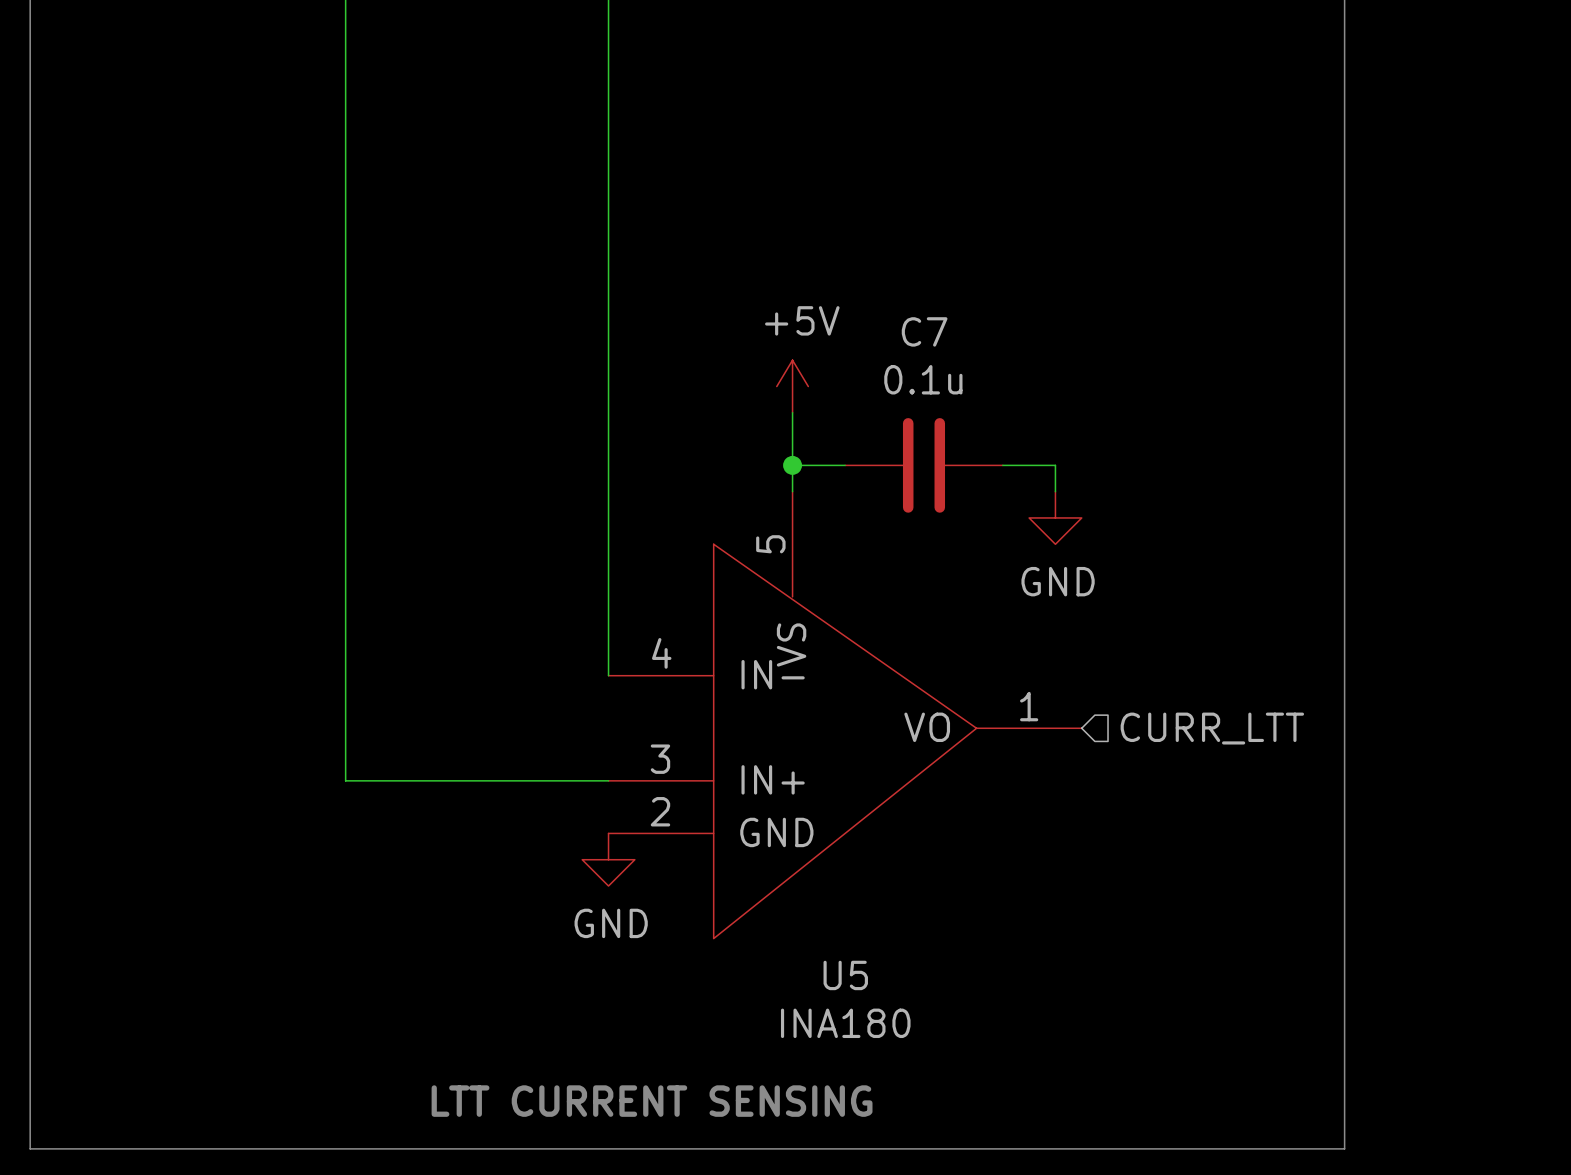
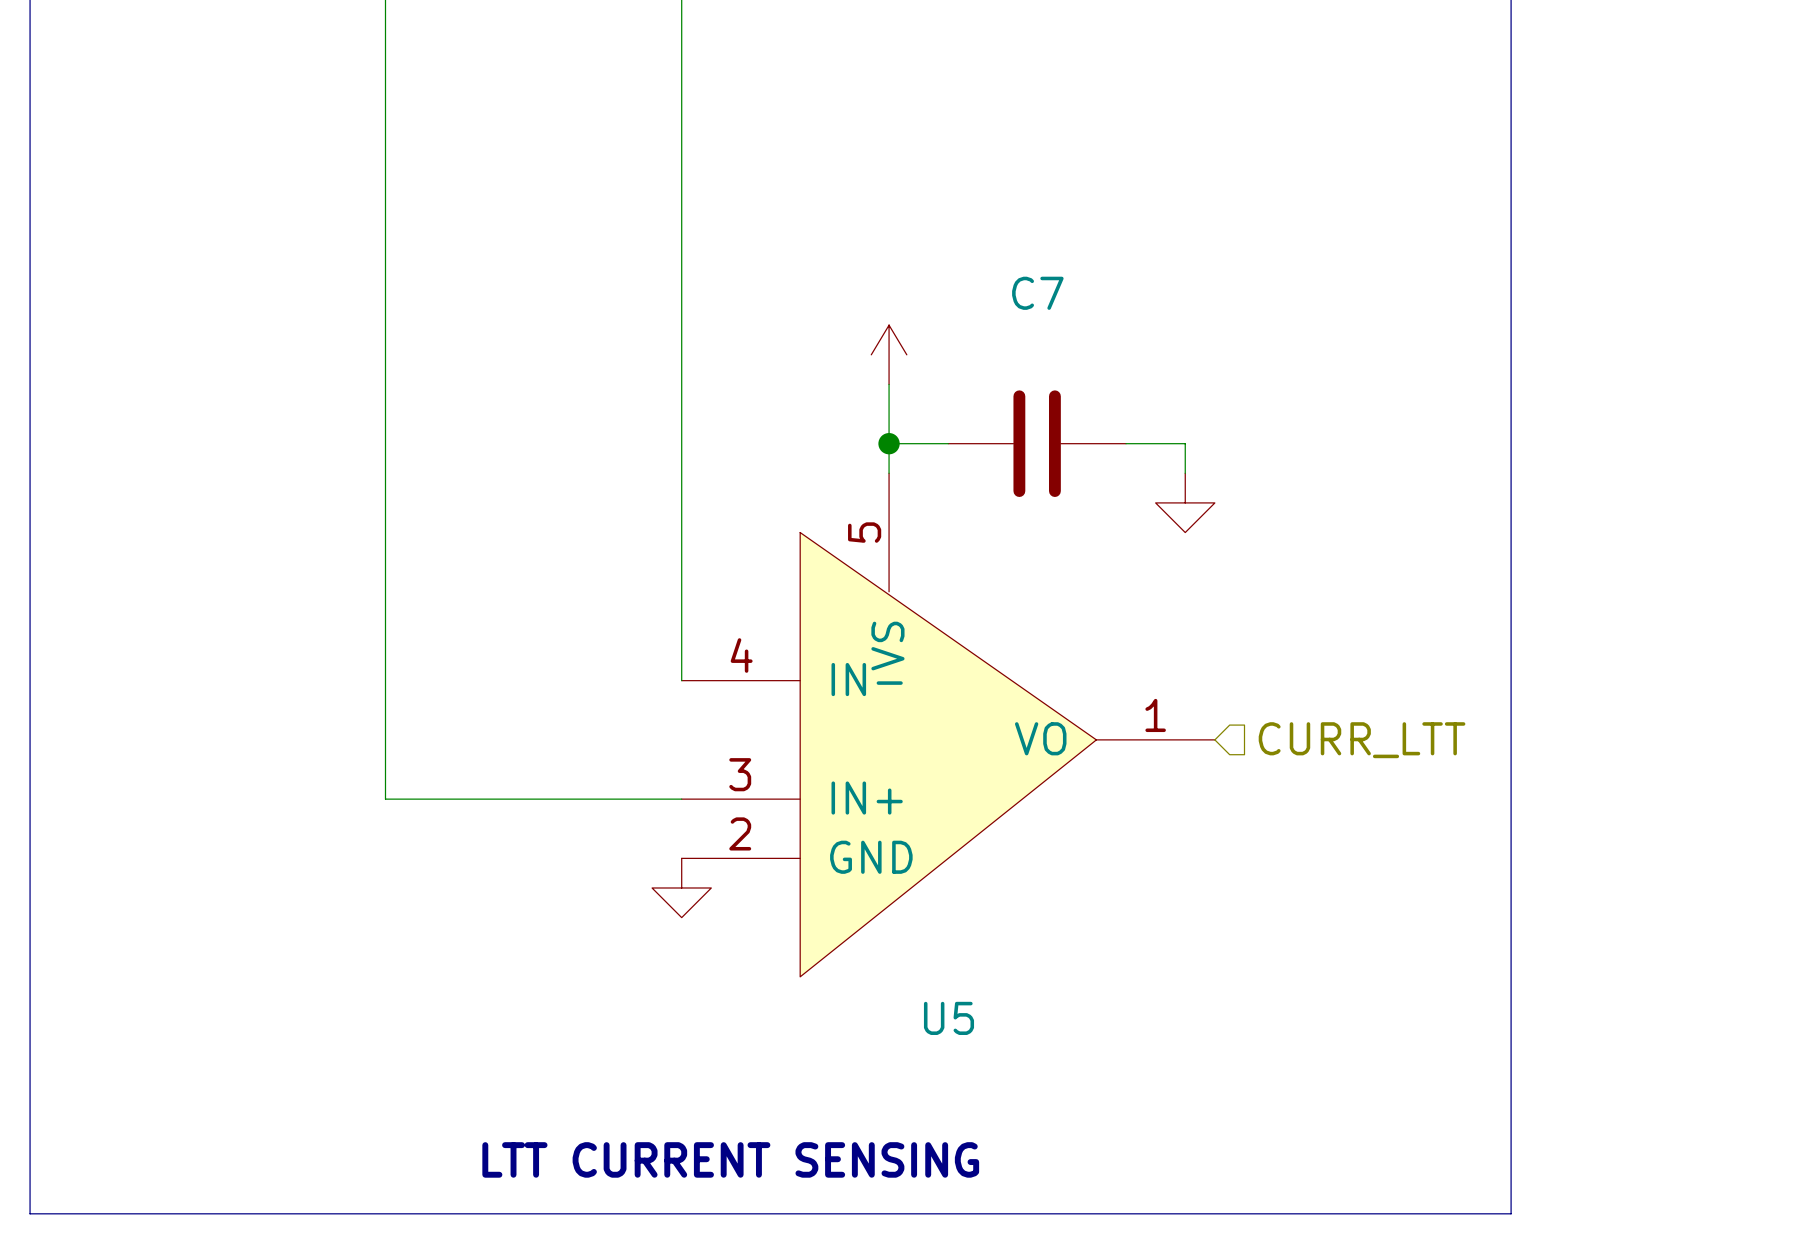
power symbol text: +5V (802, 320) -> none
C7 value: 0.1u (923, 379) -> none
power symbol text: GND (1058, 581) -> none
power symbol text: GND (611, 923) -> none
U5 value: INA180 (845, 1023) -> none

